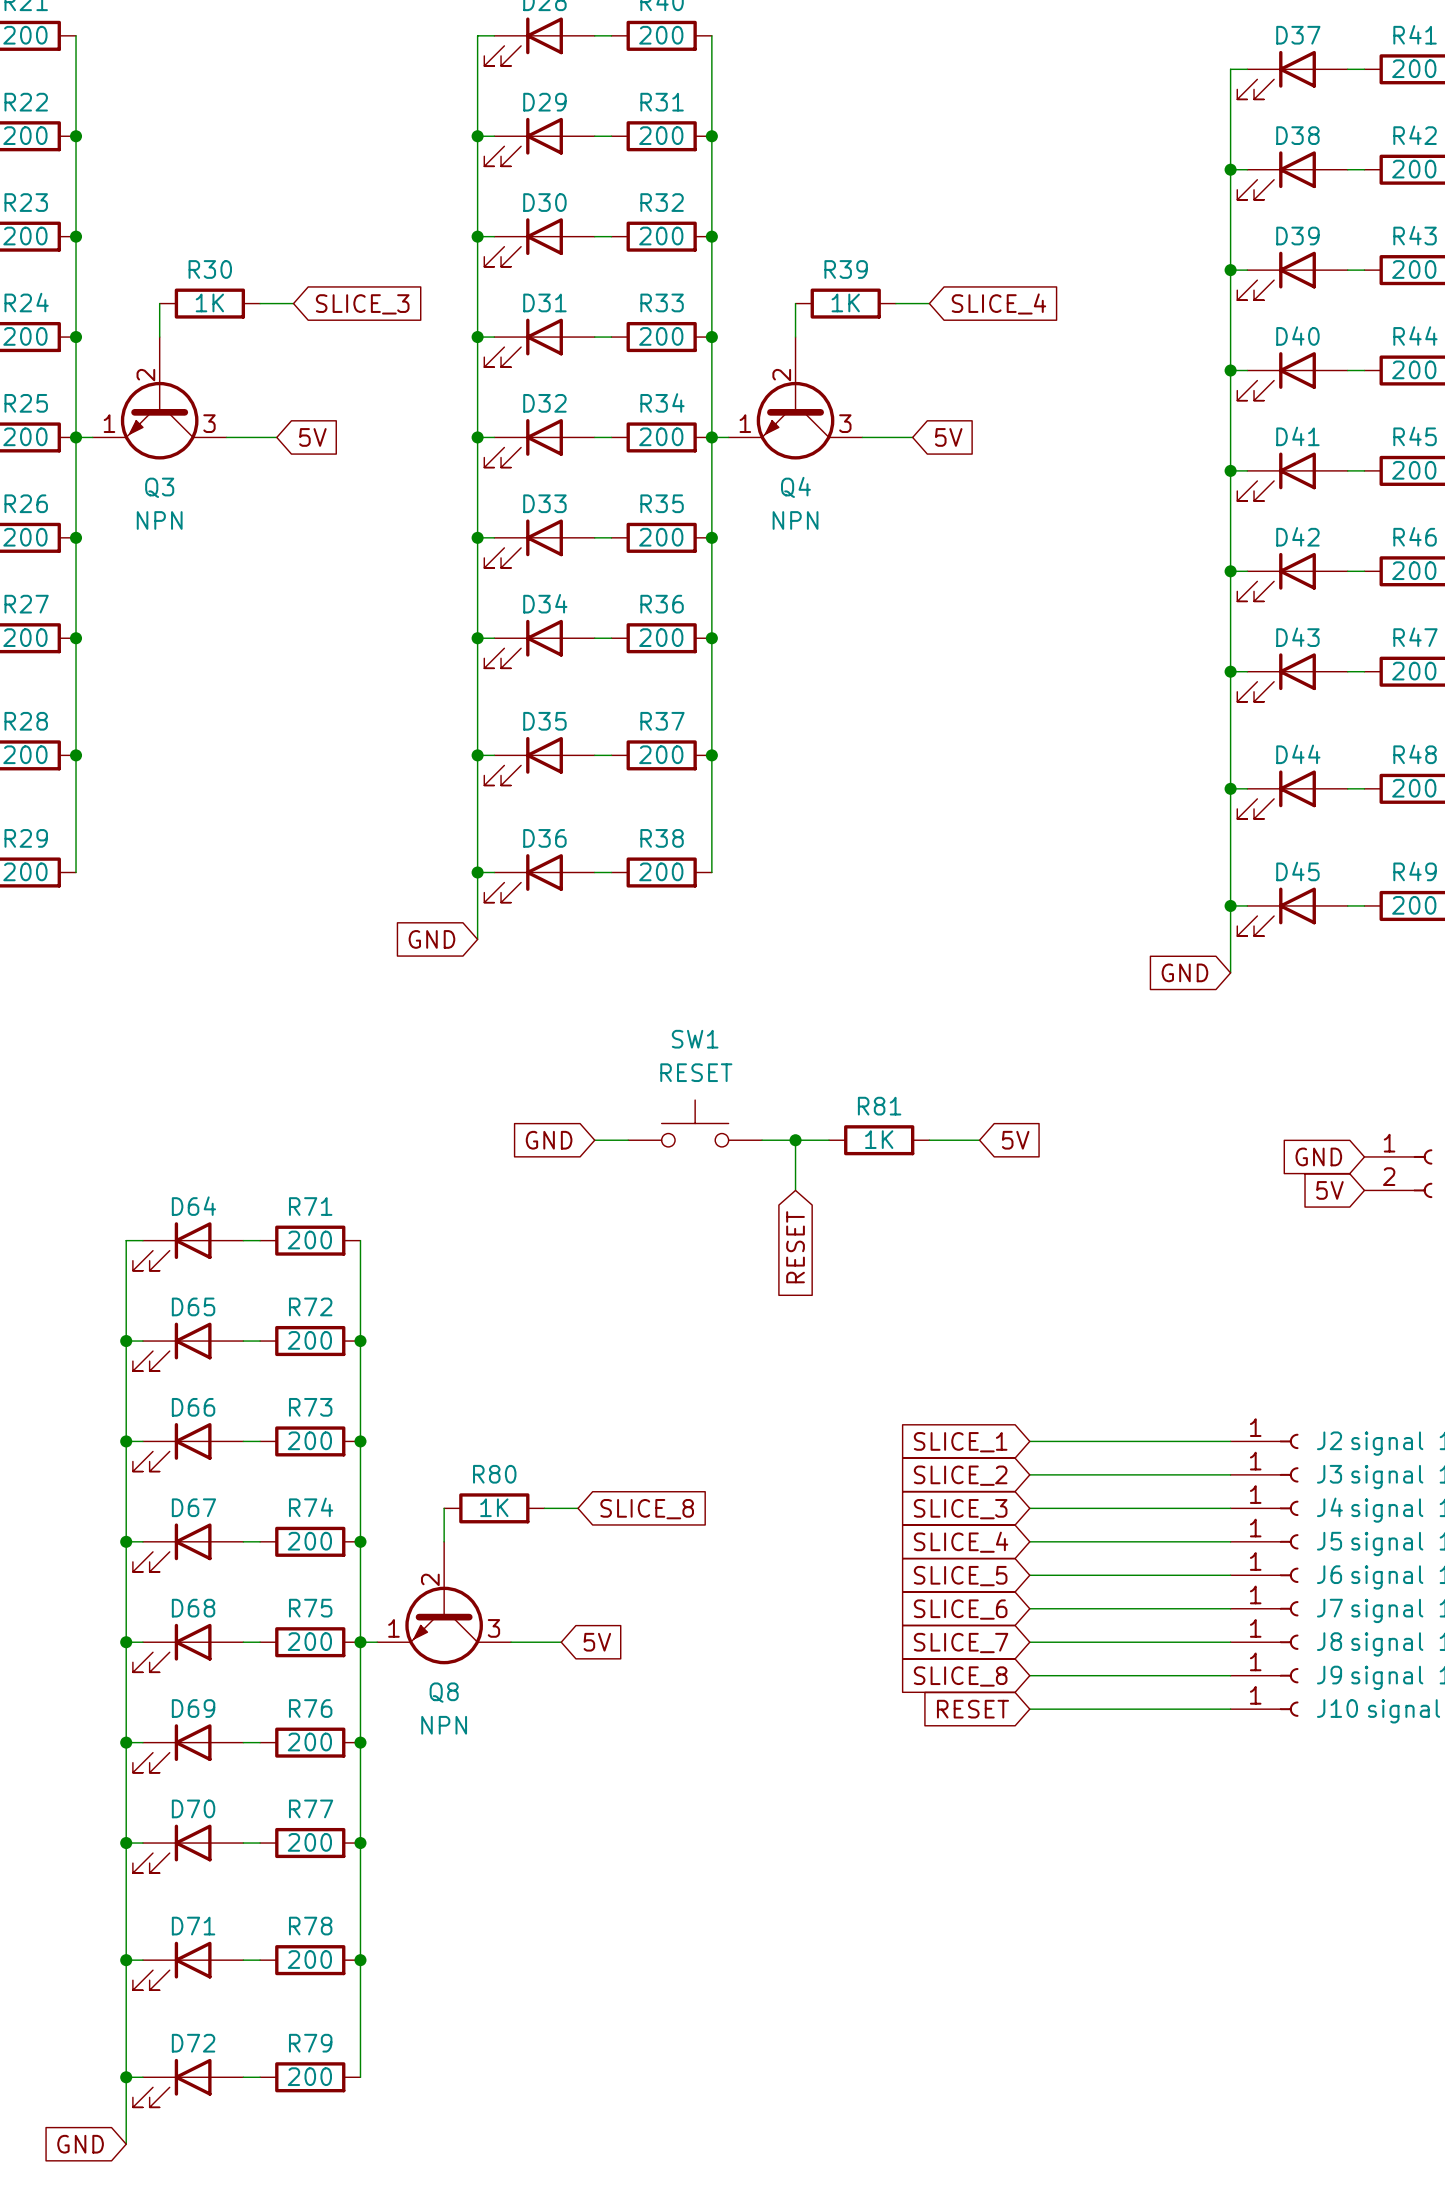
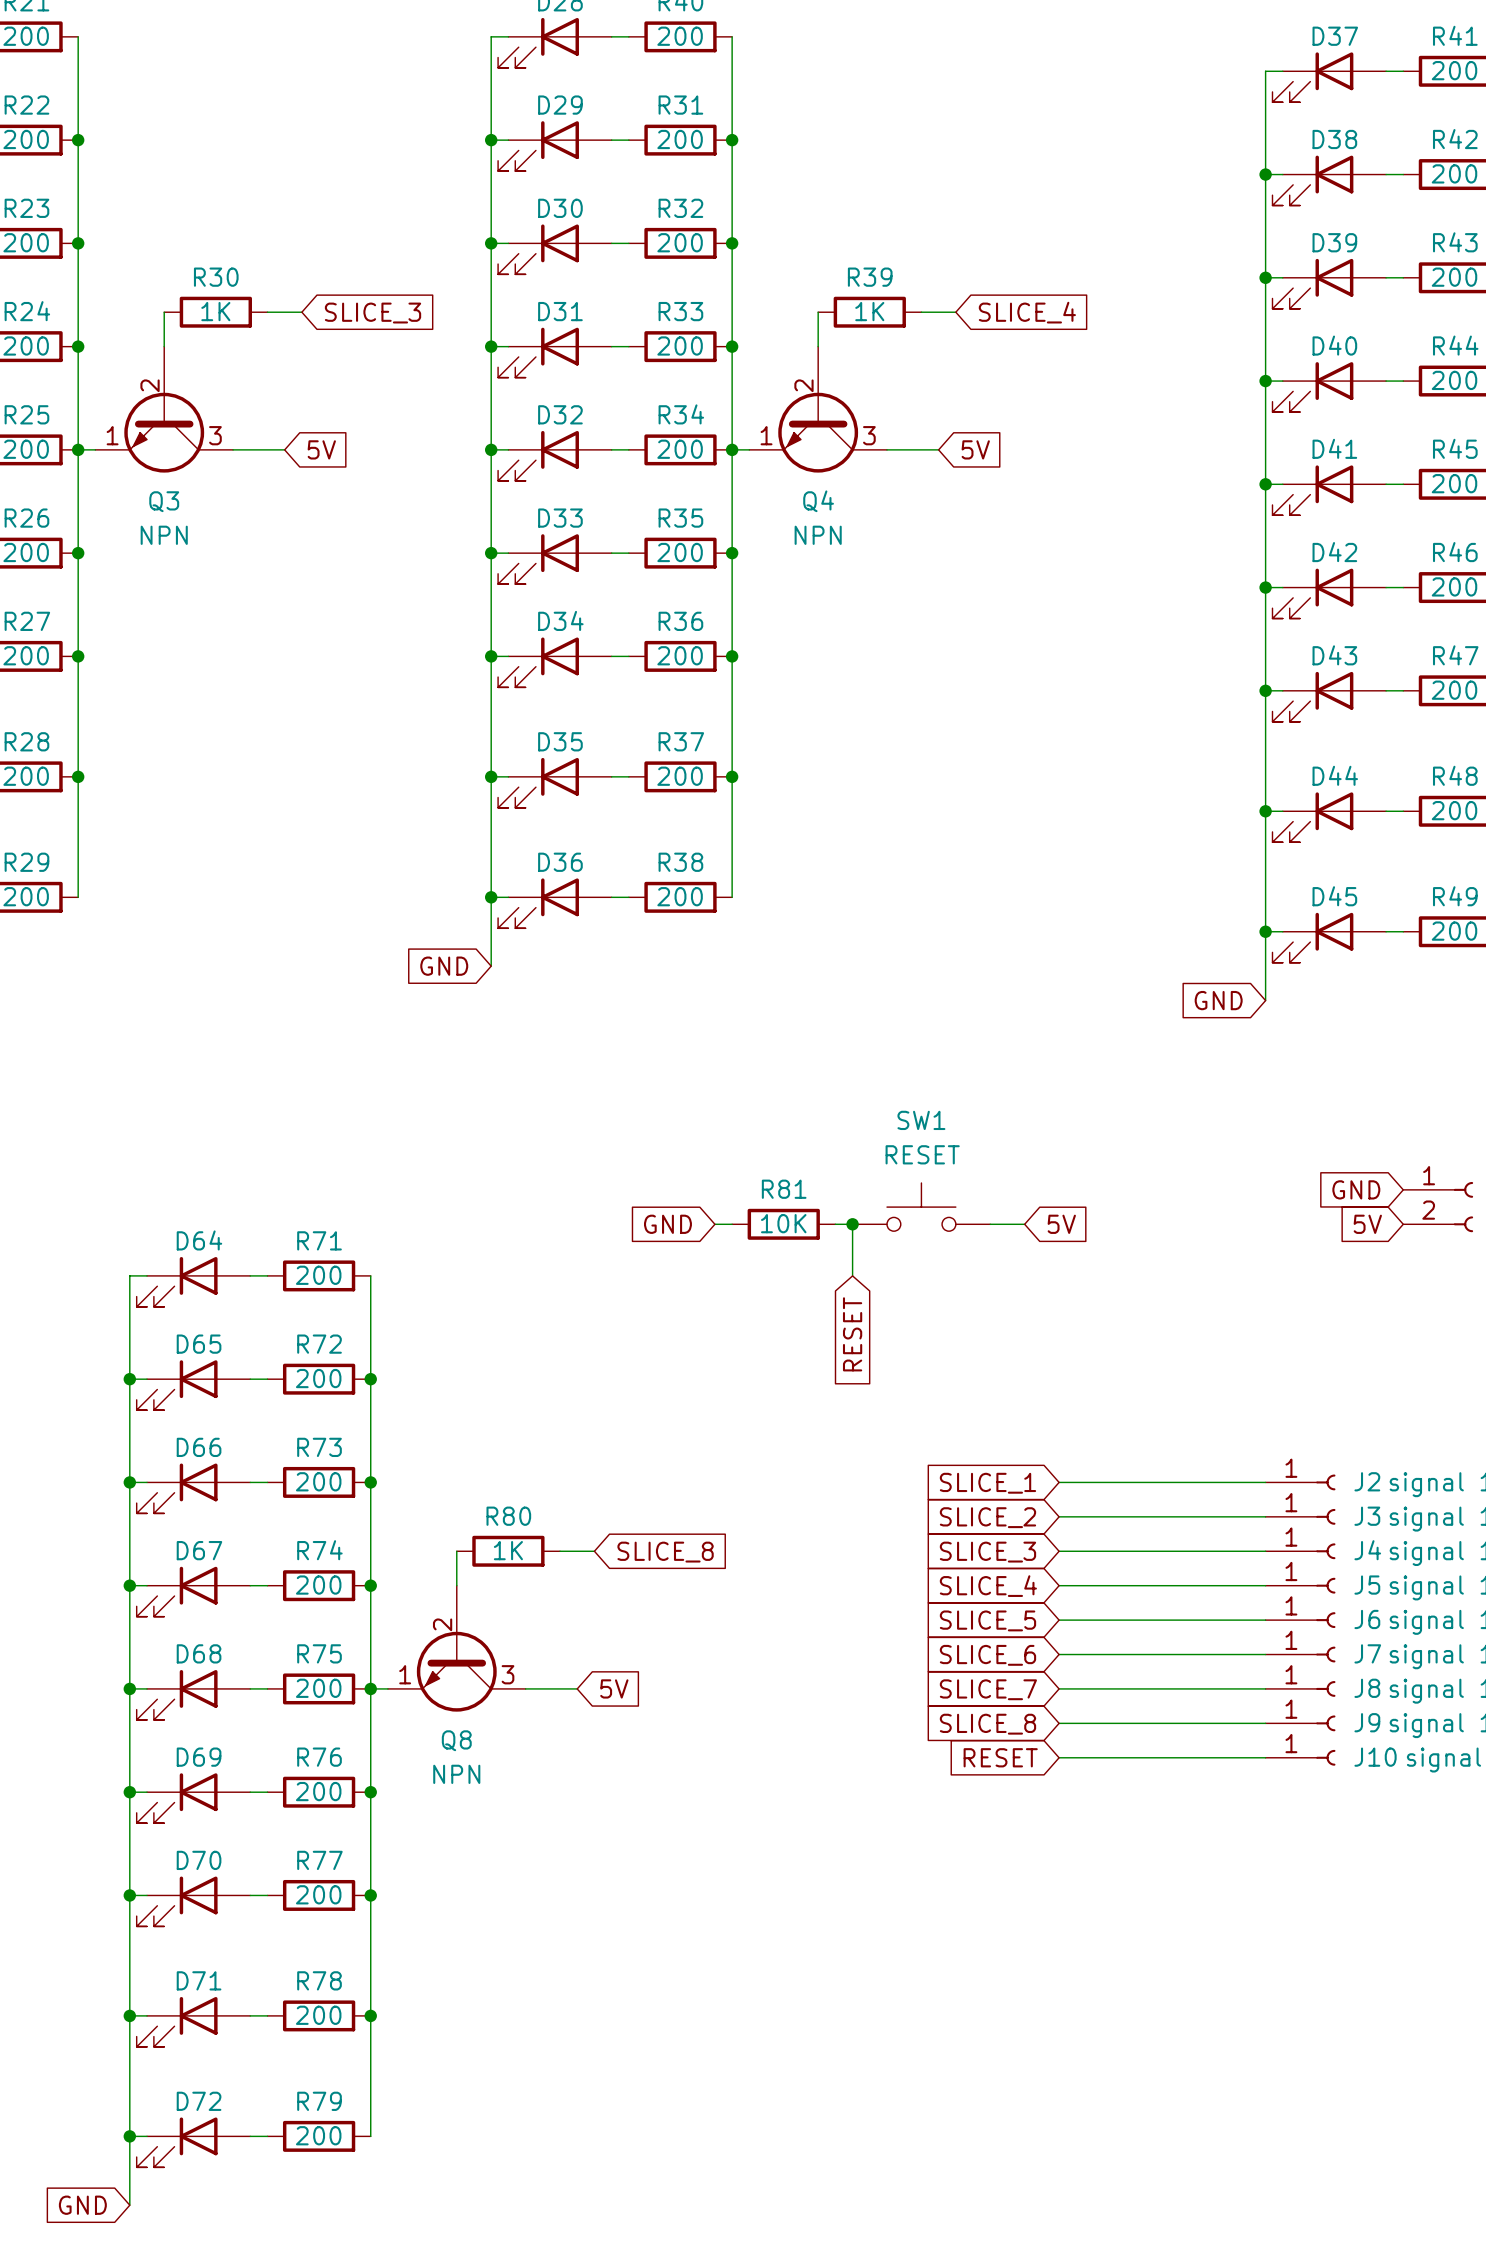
SW1 position: (695, 1123) -> (921, 1207)
R81 value: 1K (879, 1139) -> 10K (783, 1223)
global label position: GND (549, 1140) -> GND (667, 1224)
wire: (594, 1140) (628, 1140) -> none
wire: (762, 1140) (829, 1140) -> none
wire: (795, 1140) (795, 1190) -> none
junction position: (795, 1140) -> (852, 1224)
R81 position: (879, 1140) -> (783, 1224)
wire: (929, 1140) (979, 1140) -> none
global label position: 5V (1015, 1140) -> 5V (1061, 1224)
wire: none -> (714, 1224) (732, 1224)
wire: none -> (835, 1224) (852, 1224) (852, 1275)
wire: none -> (990, 1224) (1024, 1224)
global label position: RESET (795, 1247) -> RESET (852, 1334)

